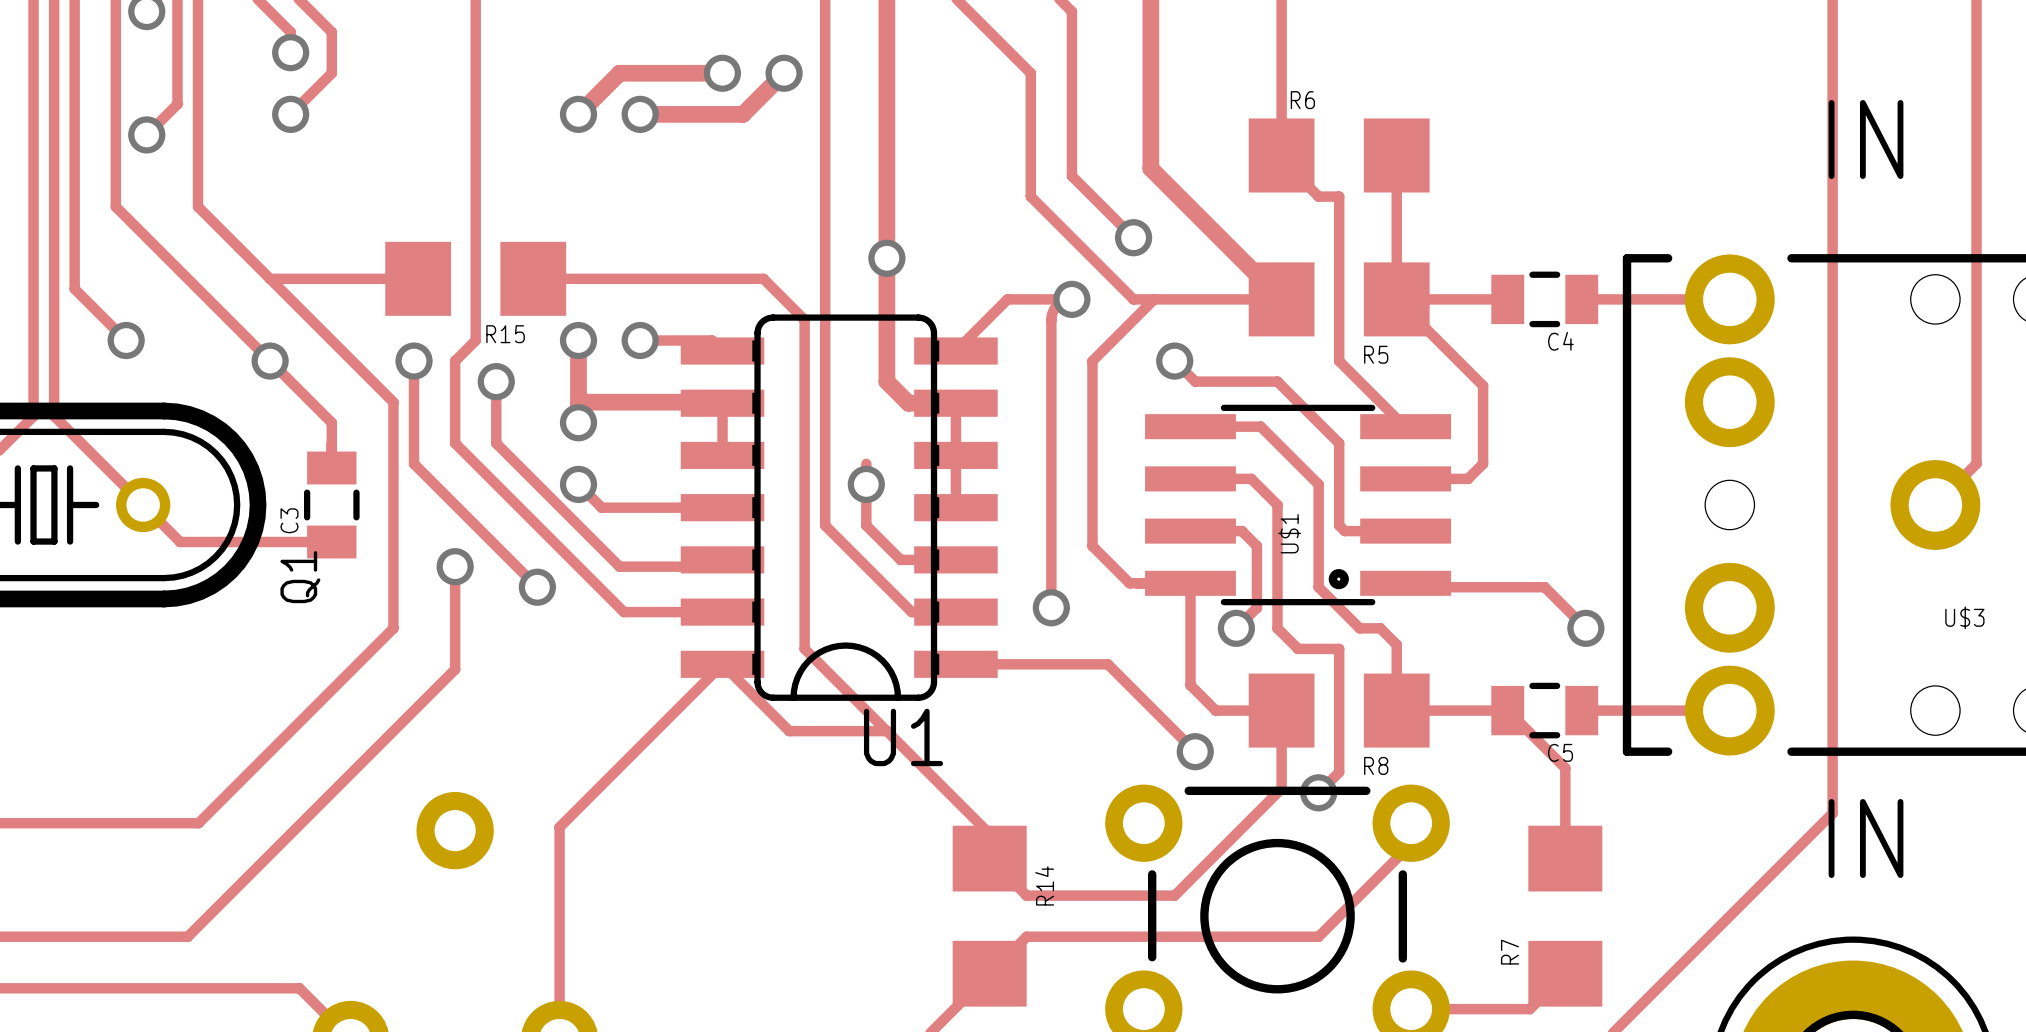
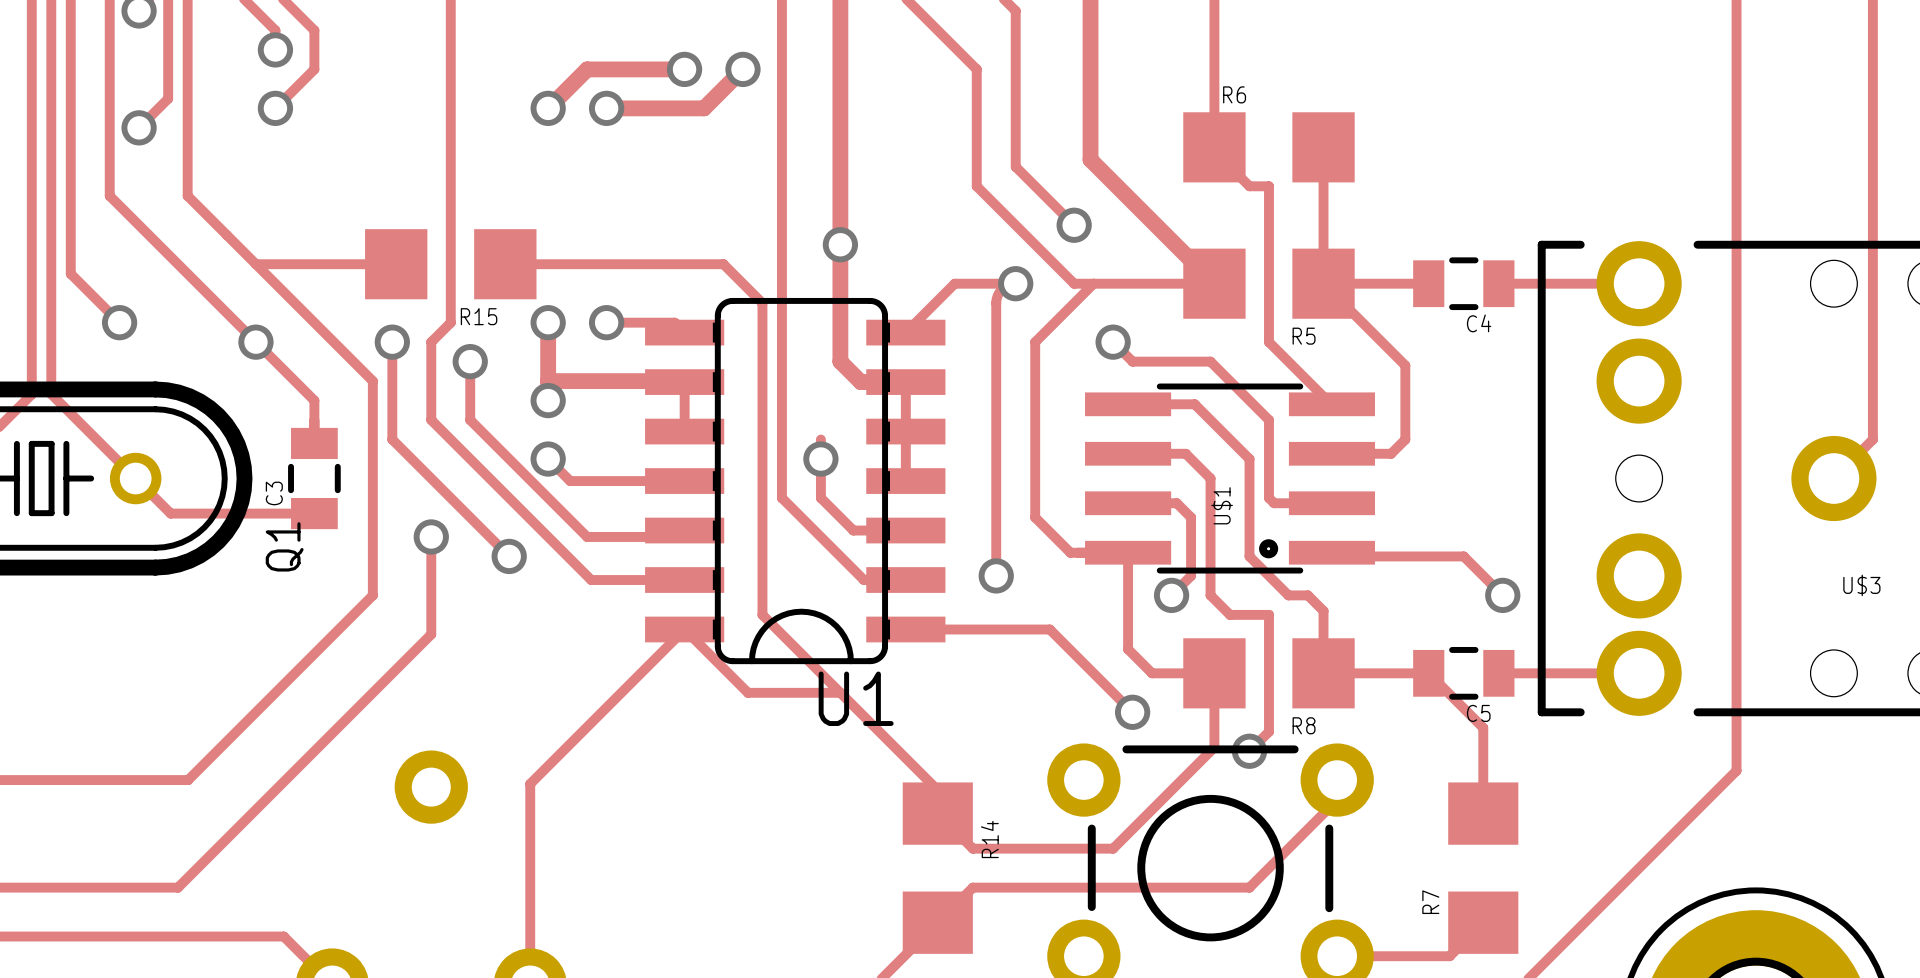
text: IN (1866, 139) -> none
text: IN (1866, 838) -> none

